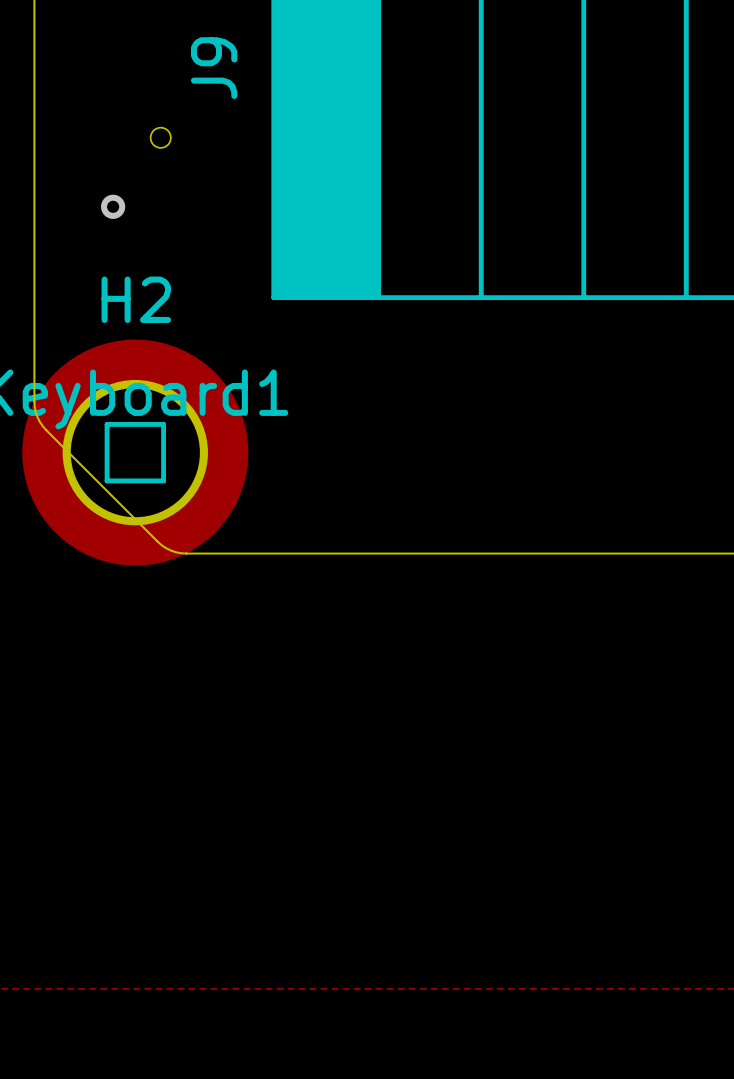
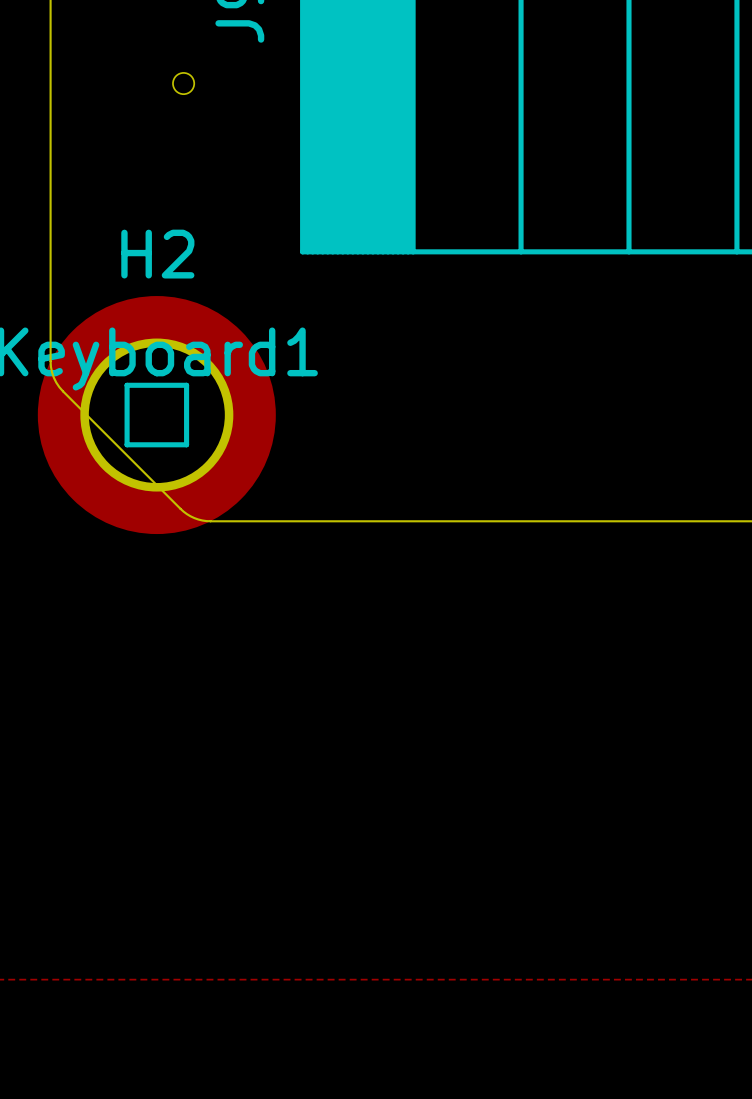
via: (113, 206) -> none

